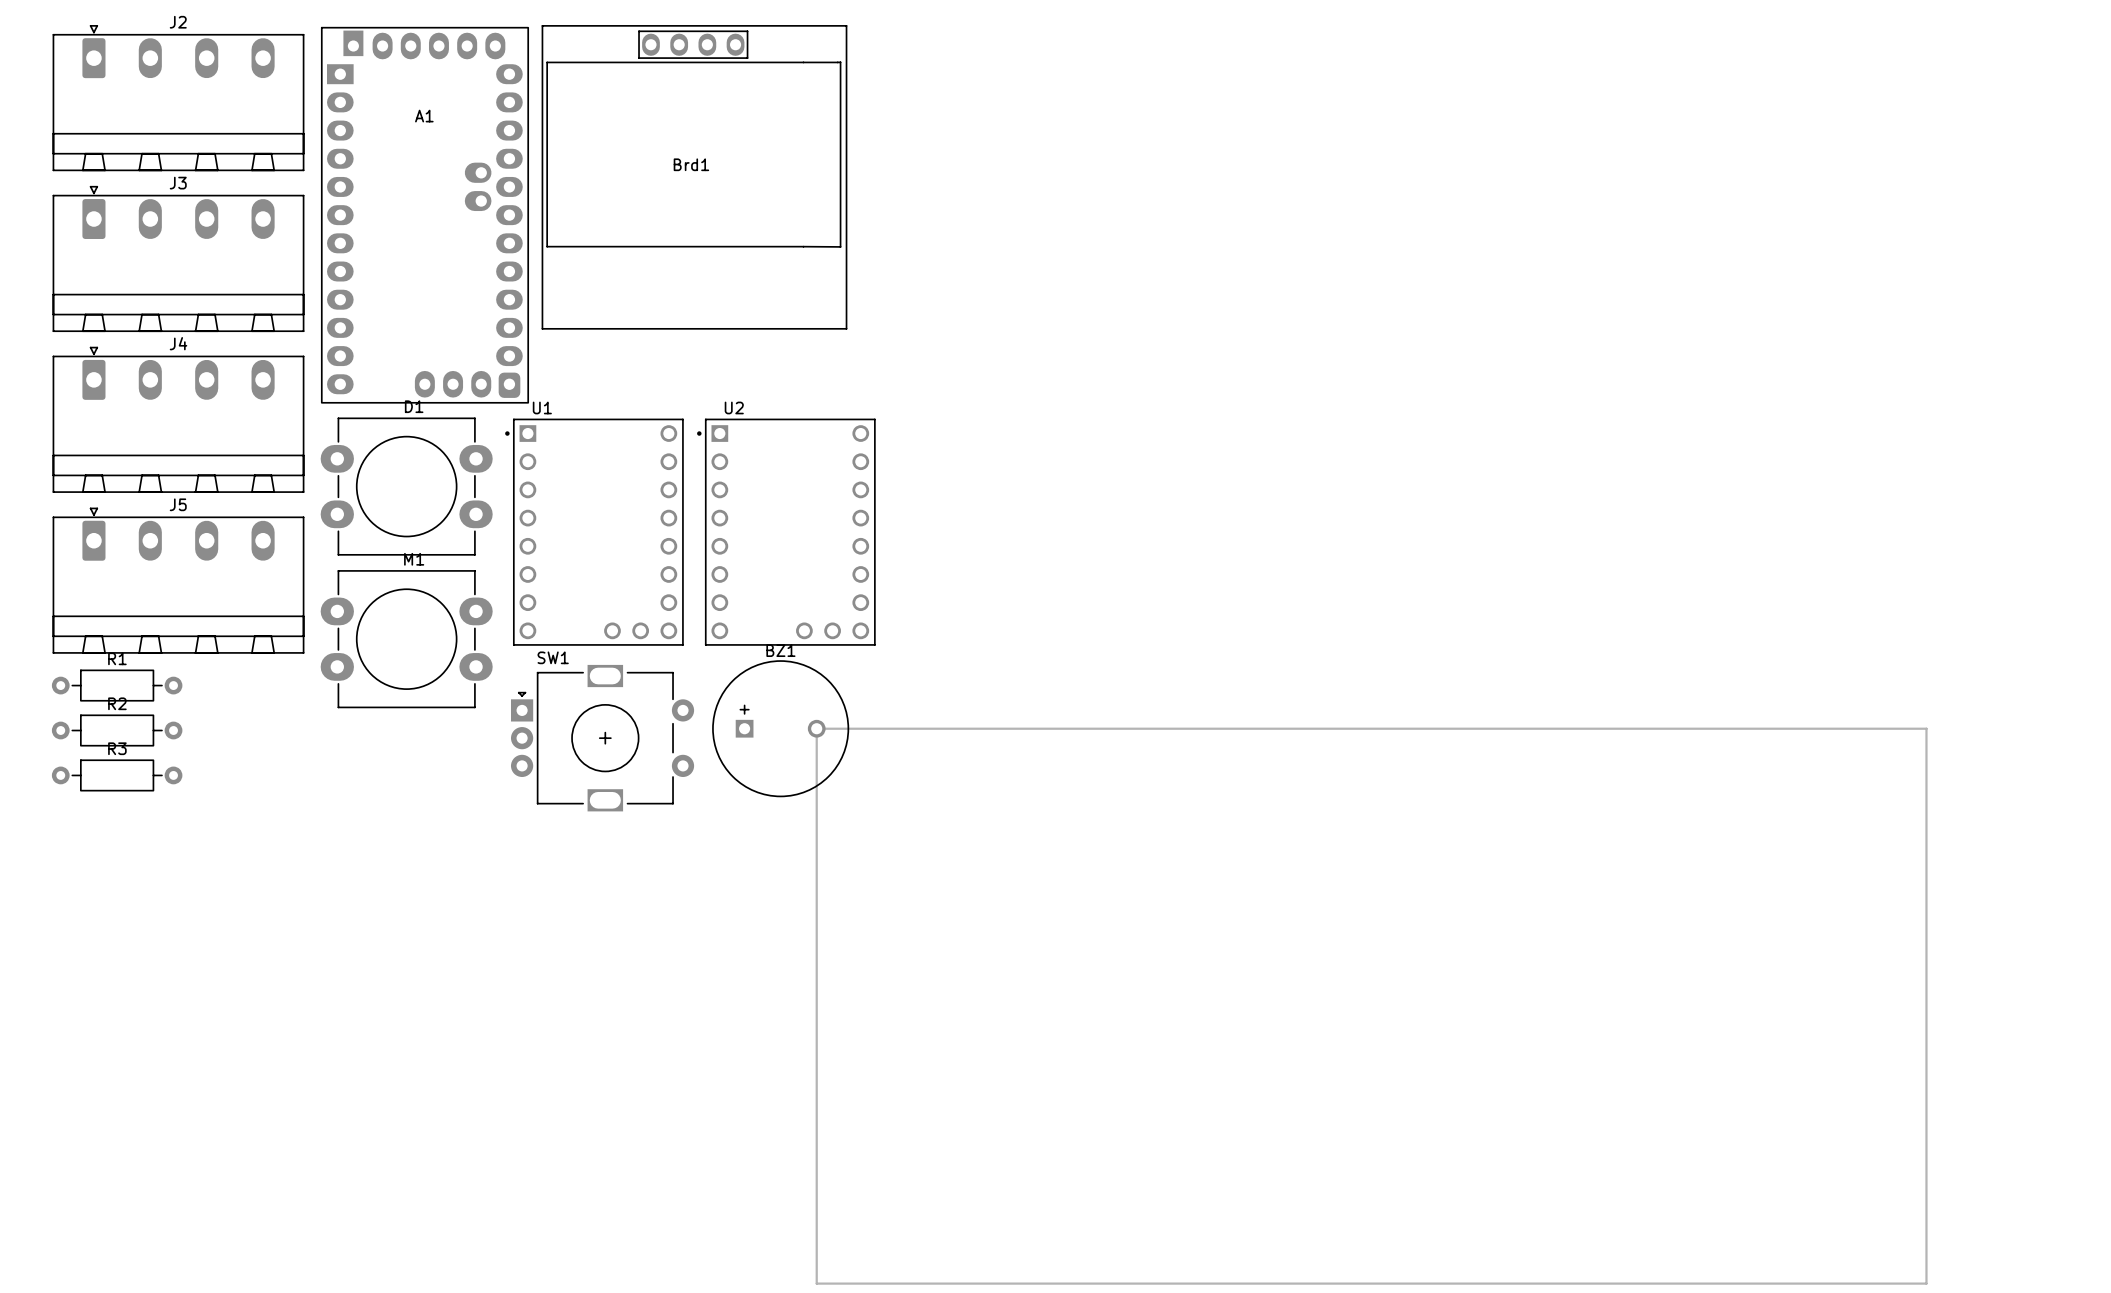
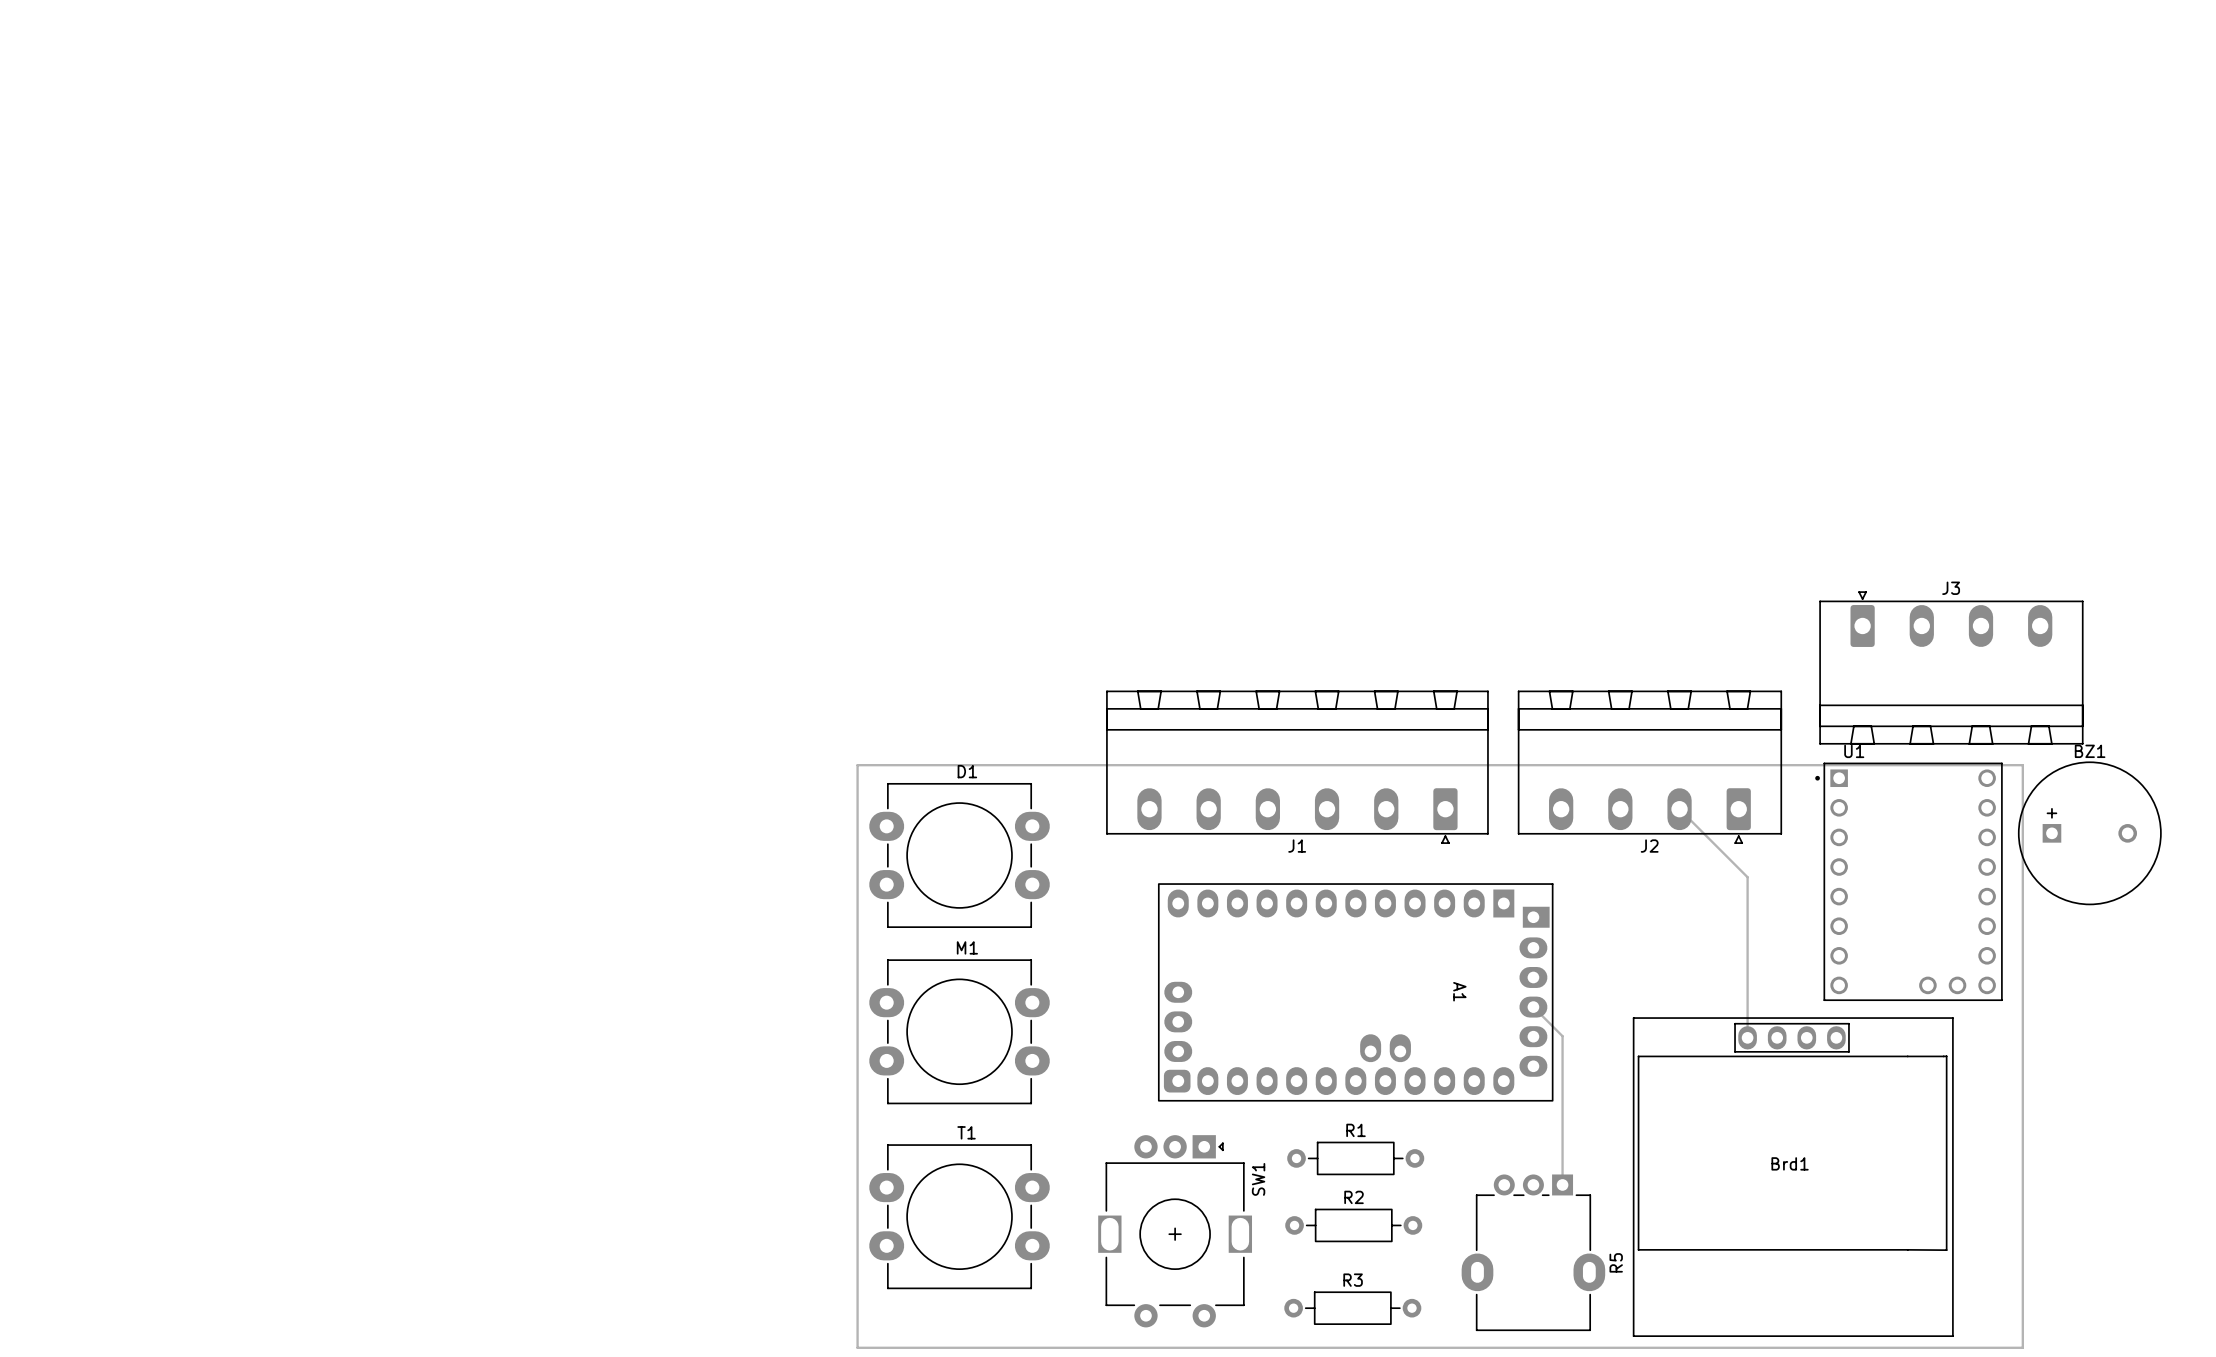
J2 rotation: 0° (178, 98) -> 180° (1649, 767)
J2 position: (178, 98) -> (1649, 767)
Brd1 position: (694, 177) -> (1793, 1177)
A1 rotation: 0° (424, 215) -> 90° clockwise (1355, 992)
A1 position: (424, 215) -> (1355, 992)
J3 position: (178, 258) -> (1951, 667)
J4: (178, 419) -> none
D1 position: (406, 486) -> (959, 855)
U1 position: (594, 532) -> (1908, 881)
U2: (786, 532) -> none
J5: (178, 580) -> none
M1 position: (406, 639) -> (959, 1031)
R1 position: (117, 685) -> (1355, 1158)
BZ1 position: (780, 728) -> (2089, 833)
R2 position: (117, 730) -> (1353, 1225)
J1: none -> (1297, 767)
SW1 rotation: 0° (602, 738) -> 90° clockwise (1175, 1231)
SW1 position: (602, 738) -> (1175, 1231)
track: none -> (1679, 809) (1747, 877) (1747, 1037)
R3 position: (117, 775) -> (1352, 1308)
track: none -> (1533, 1007) (1562, 1036) (1562, 1184)
T1: none -> (959, 1216)
R5: none -> (1533, 1252)

